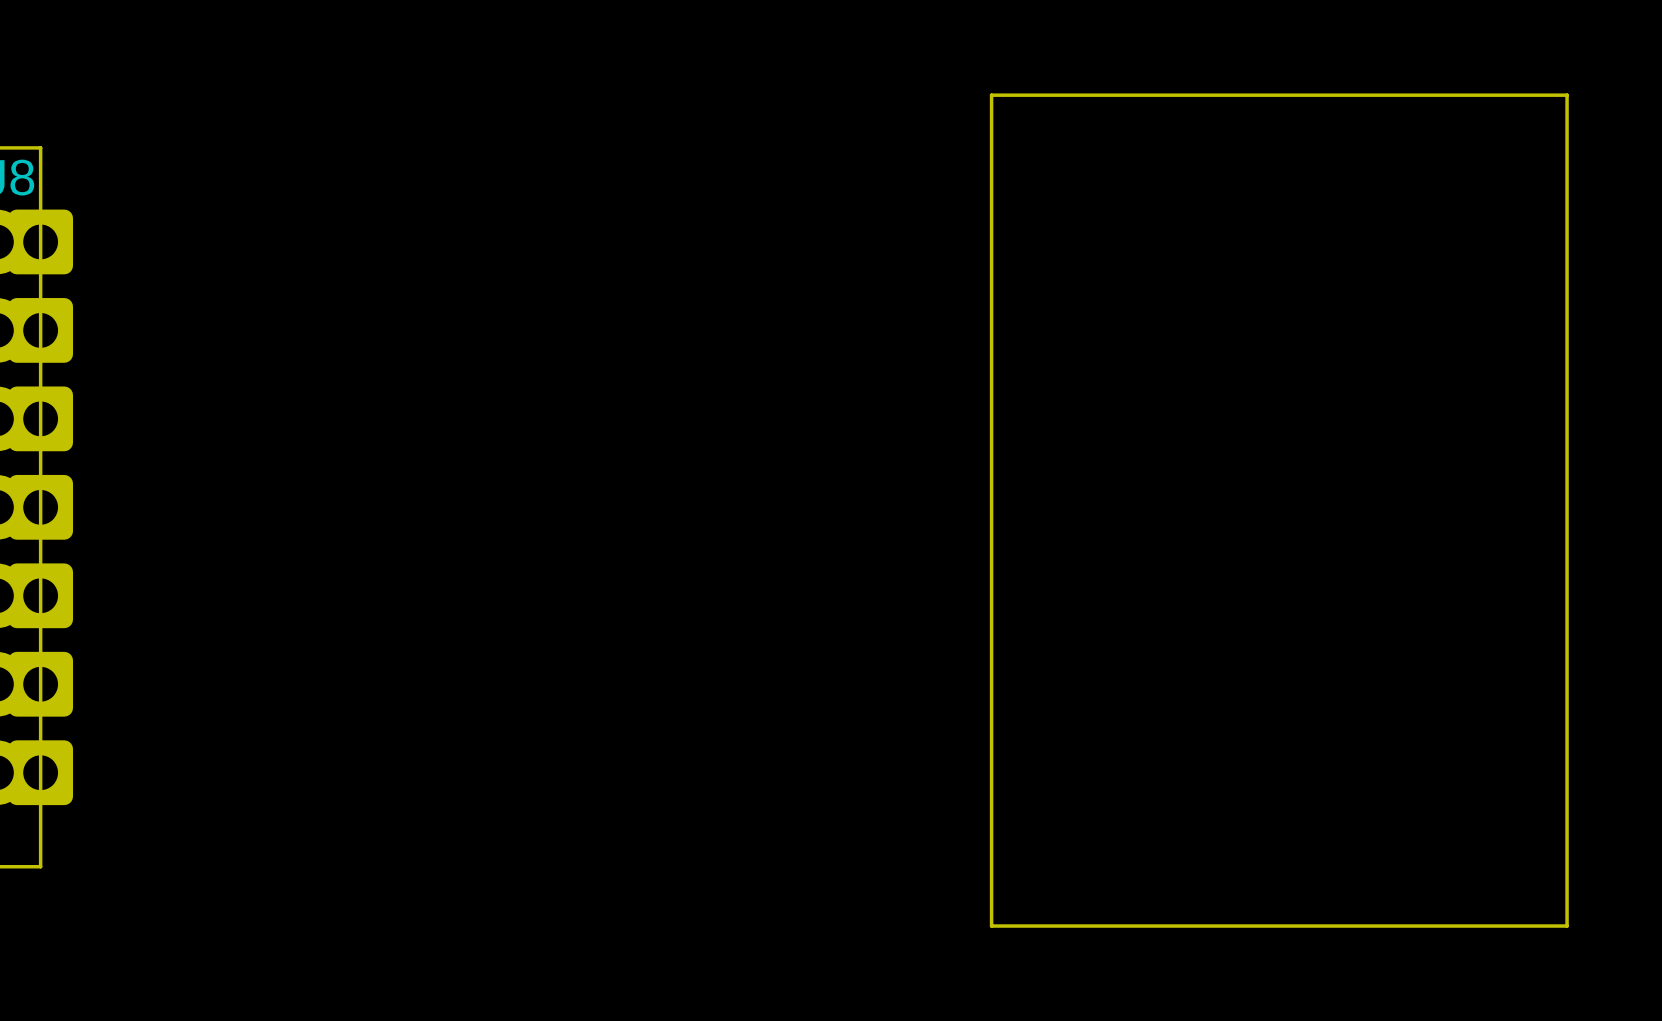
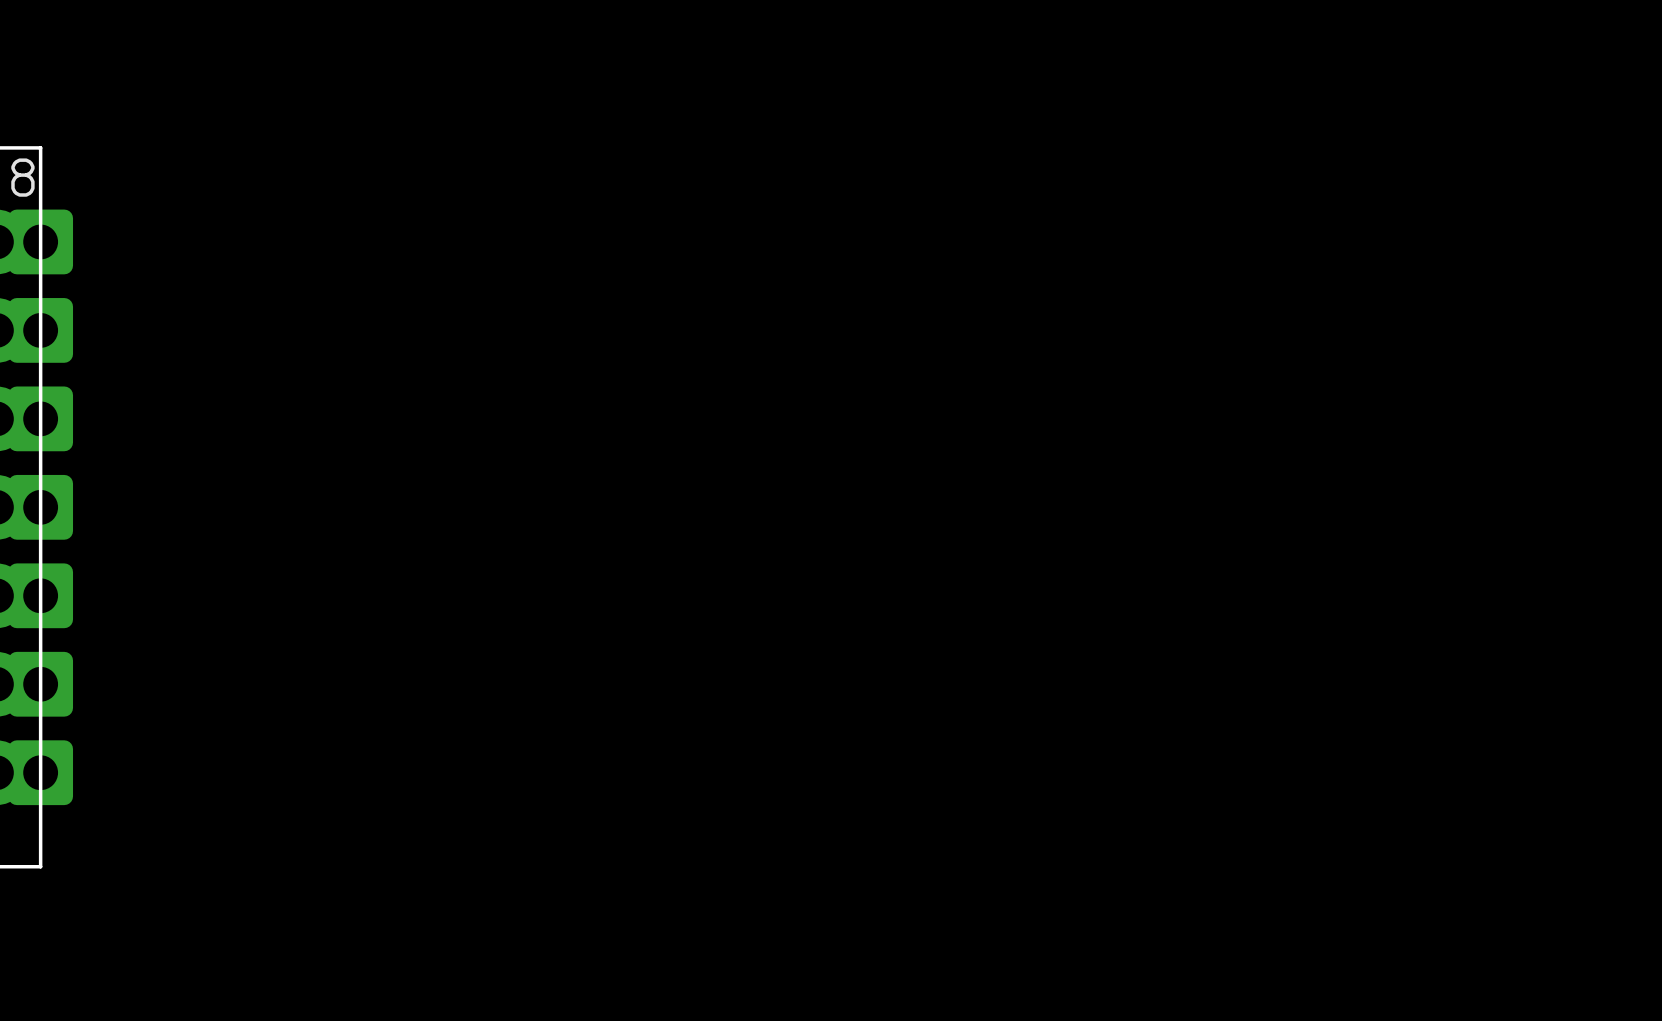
board edge: (991, 95) (1567, 95) (1567, 926) (991, 926) (991, 95) -> none

